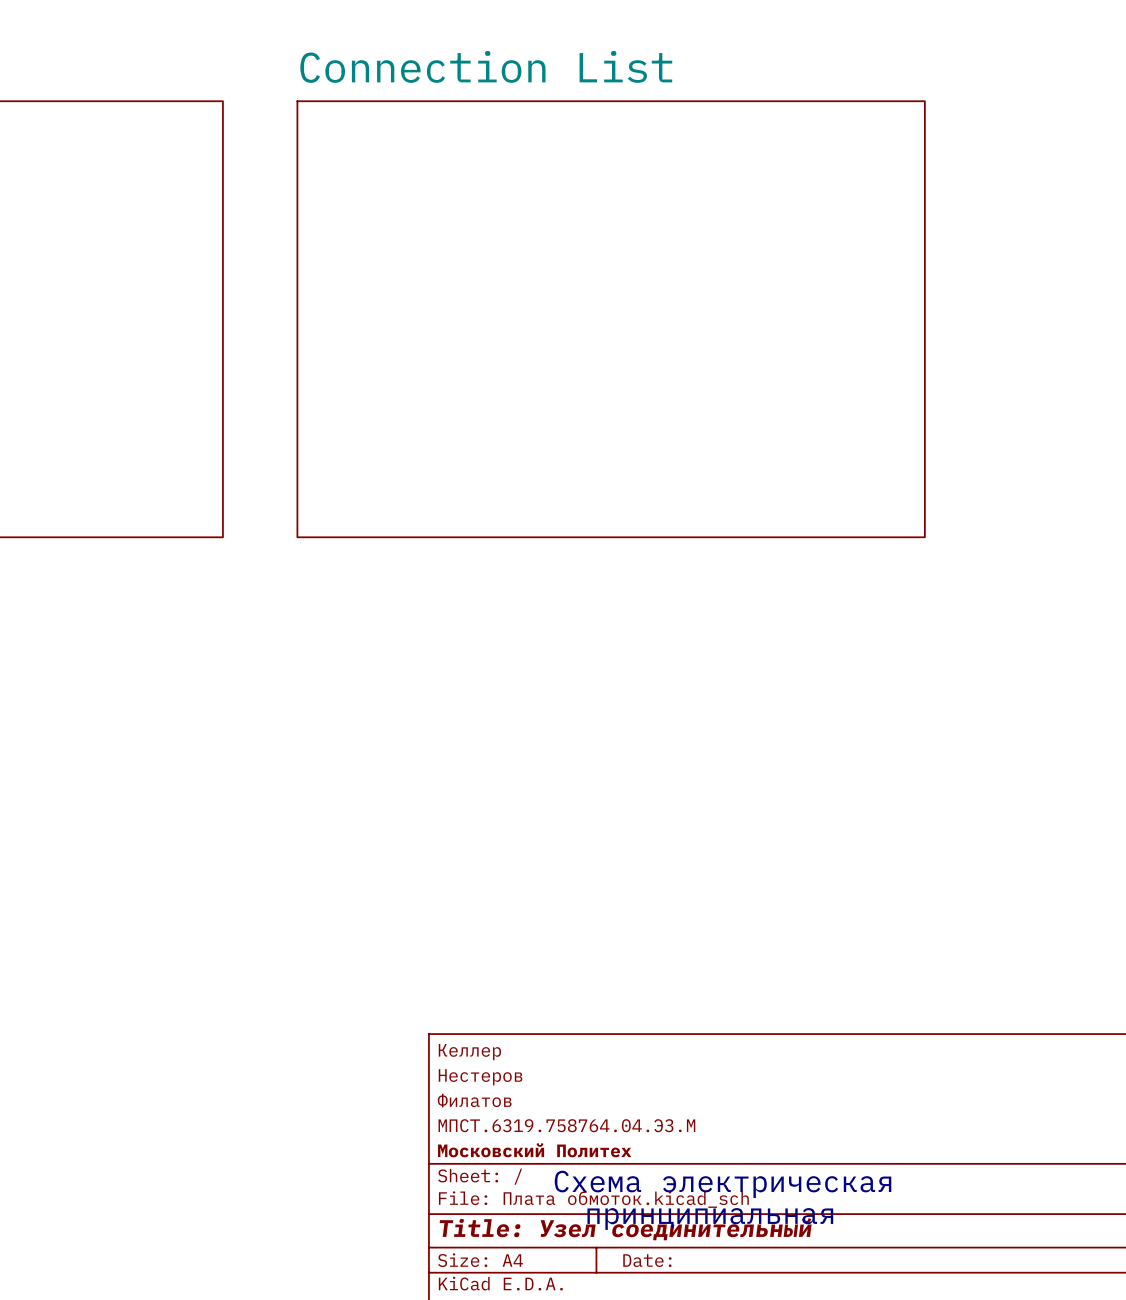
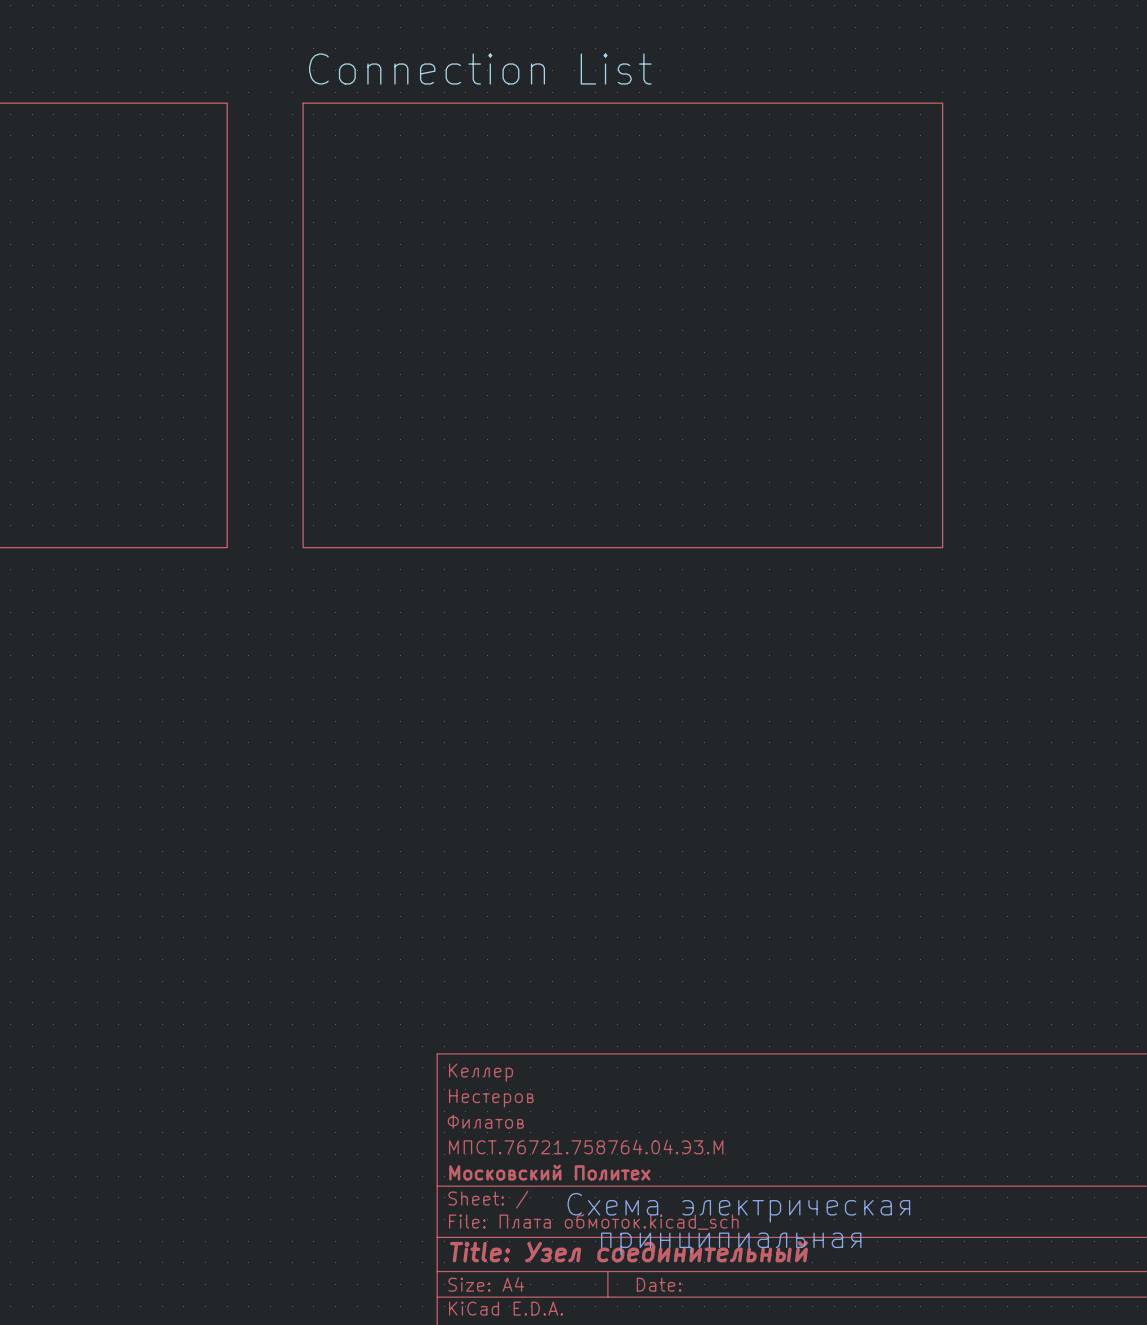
title block: МПСТ.6319.758764.04.Э3.М (566, 1125) -> МПСТ.76721.758764.04.Э3.М (586, 1146)

